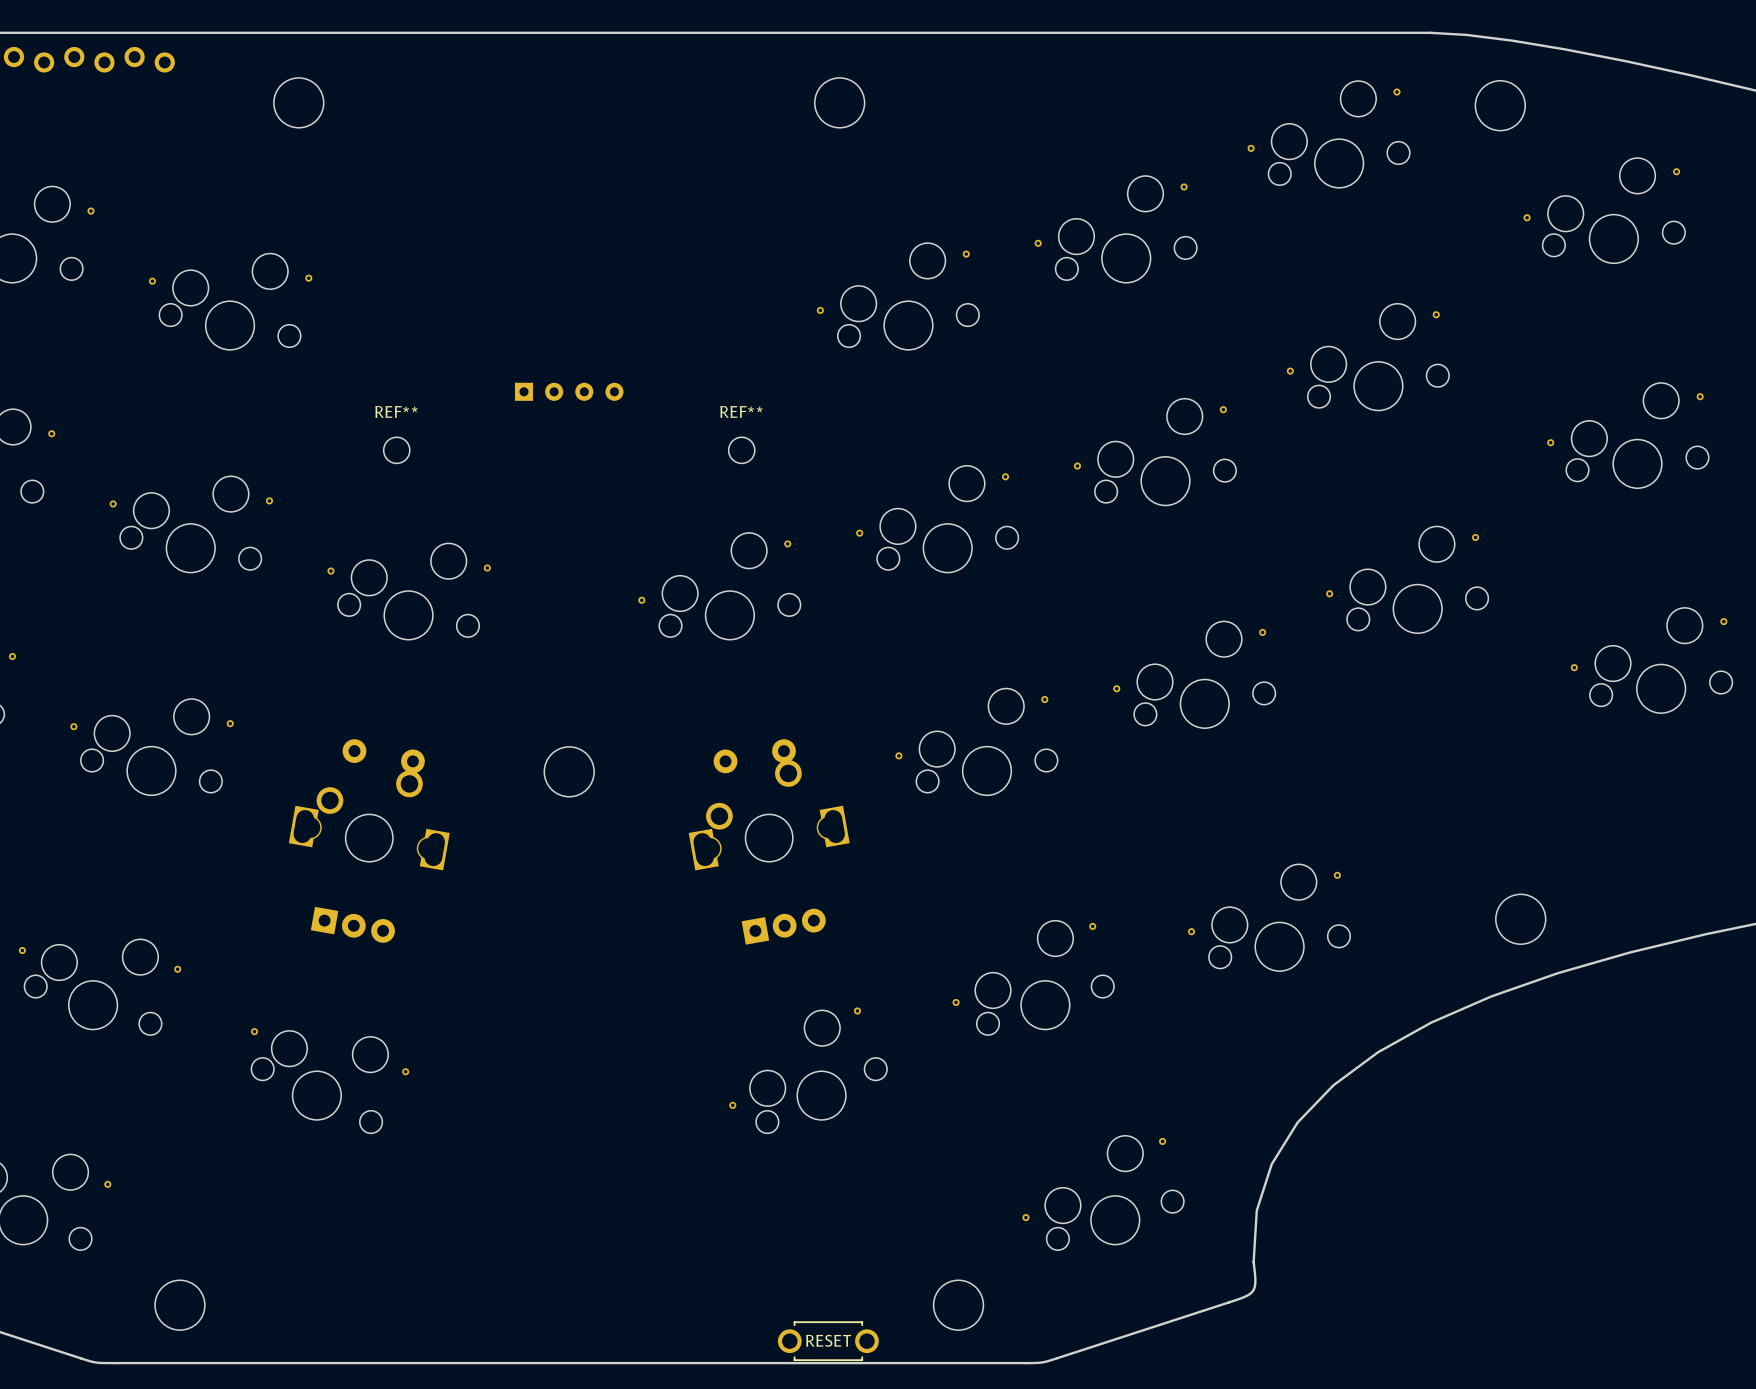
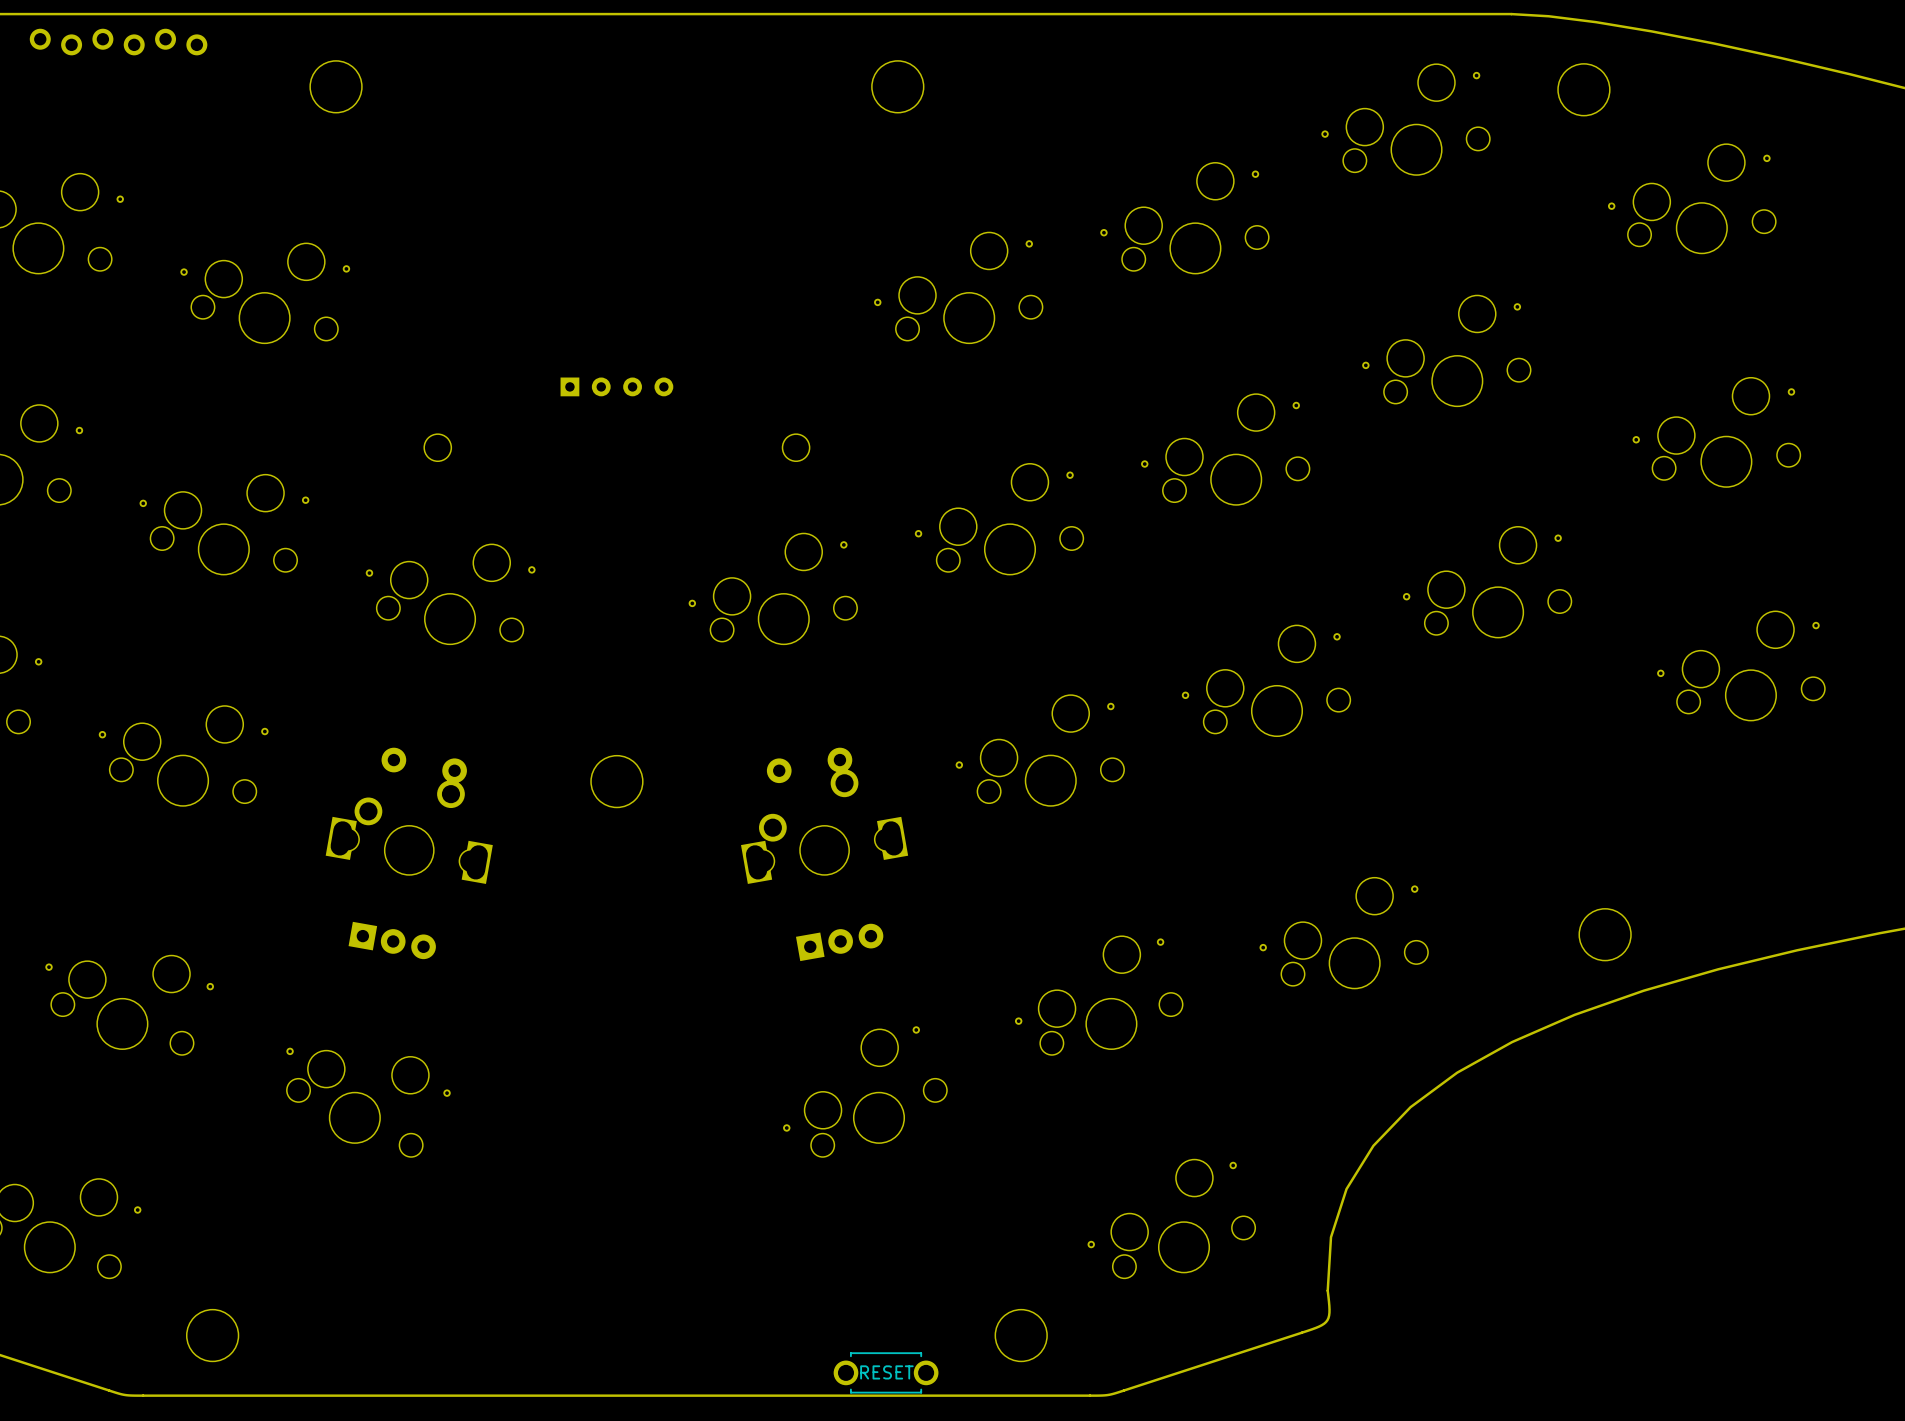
REF** name: REF** (396, 411) -> none
REF** name: REF** (741, 411) -> none

